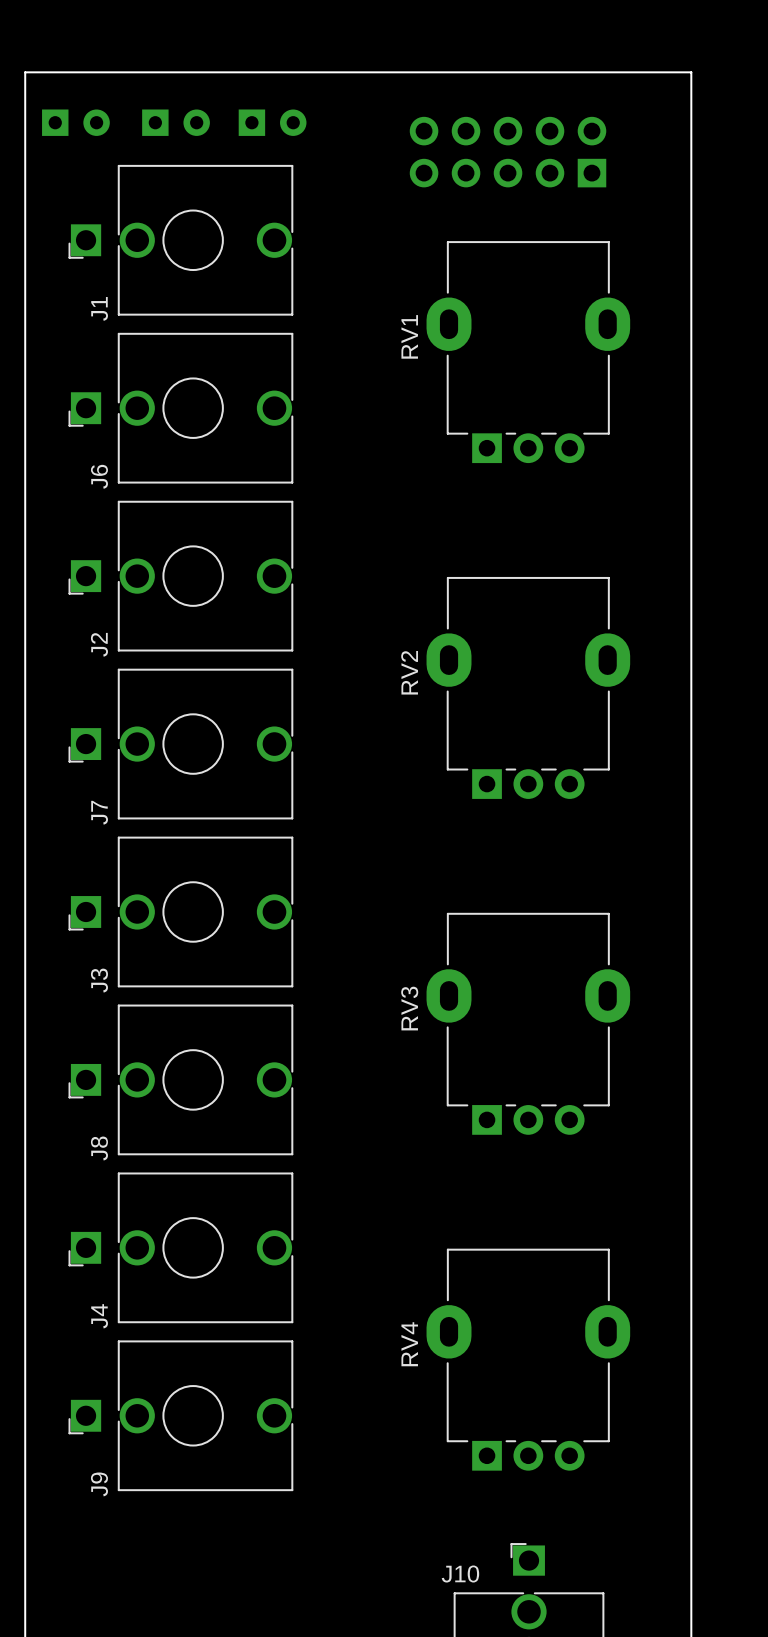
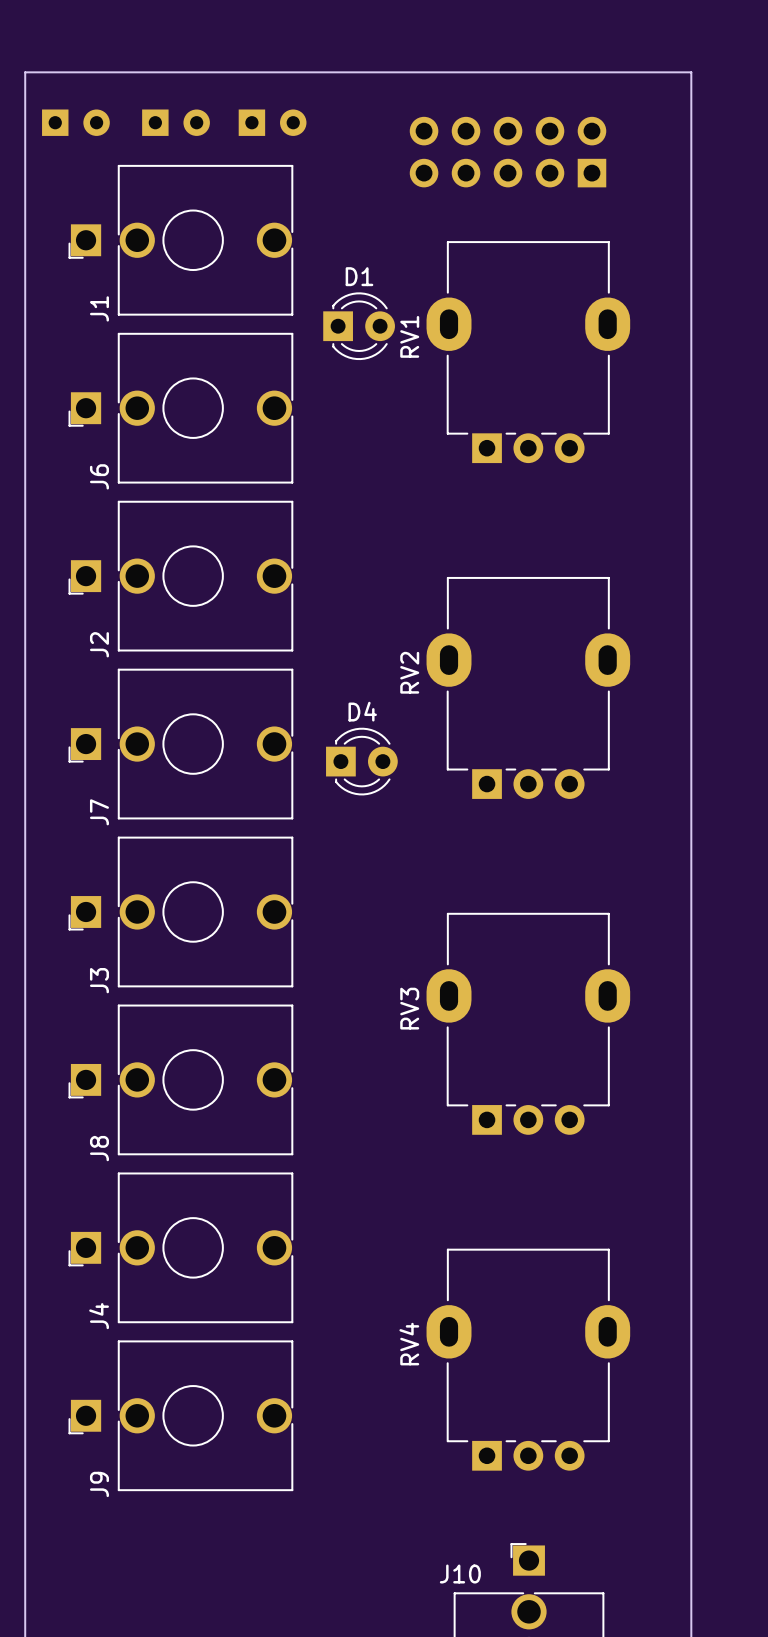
D1: none -> (359, 326)
D4: none -> (361, 761)

